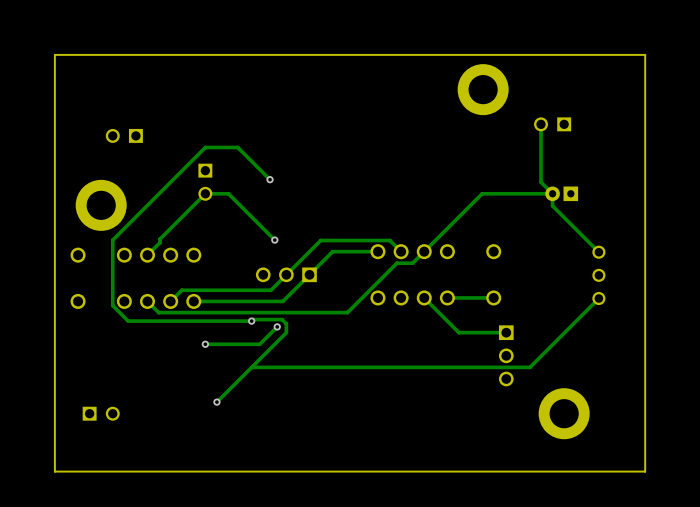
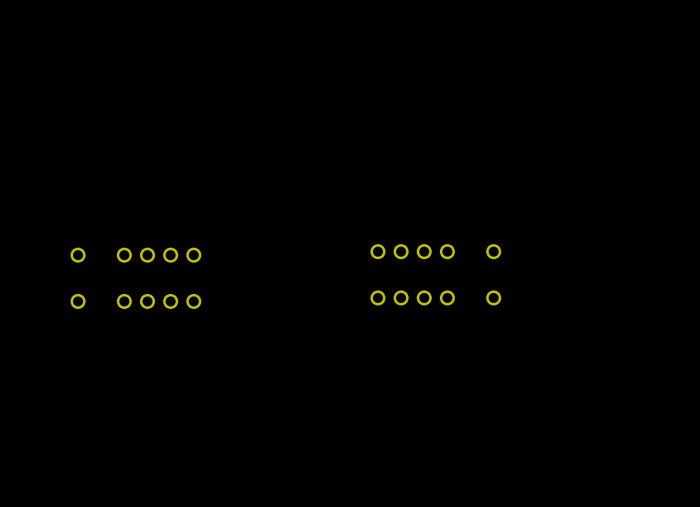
board edge: (645, 54) (54, 54) (54, 471) (645, 471) (645, 54) -> none
part: (483, 89) -> none
track: (541, 124) (541, 182) (552, 193) -> none
part: (552, 124) -> none
part: (124, 135) -> none
track: (270, 179) (237, 147) (205, 147) (112, 240) (112, 305) (128, 321) (282, 319) (286, 323) (286, 332) (216, 402) -> none
via: (270, 179) -> none
part: (205, 182) -> none
track: (552, 193) (552, 205) (598, 252) -> none
track: (552, 193) (482, 193) (412, 263) (396, 263) (347, 312) (158, 312) (147, 301) -> none
part: (561, 193) -> none
part: (101, 205) -> none
track: (274, 240) (228, 193) (205, 193) (160, 239) (160, 242) (147, 255) -> none
via: (274, 240) -> none
track: (377, 251) (332, 251) (282, 301) (193, 301) -> none
track: (401, 251) (389, 240) (320, 240) (270, 290) (181, 290) (170, 301) -> none
part: (286, 274) -> none
part: (598, 275) -> none
track: (424, 297) (458, 332) (506, 332) -> none
track: (493, 297) (447, 297) -> none
track: (598, 298) (529, 367) (251, 367) -> none
via: (251, 321) -> none
track: (277, 326) (259, 344) (205, 344) -> none
via: (277, 326) -> none
via: (205, 344) -> none
part: (506, 355) -> none
via: (216, 402) -> none
part: (101, 413) -> none
part: (564, 413) -> none

